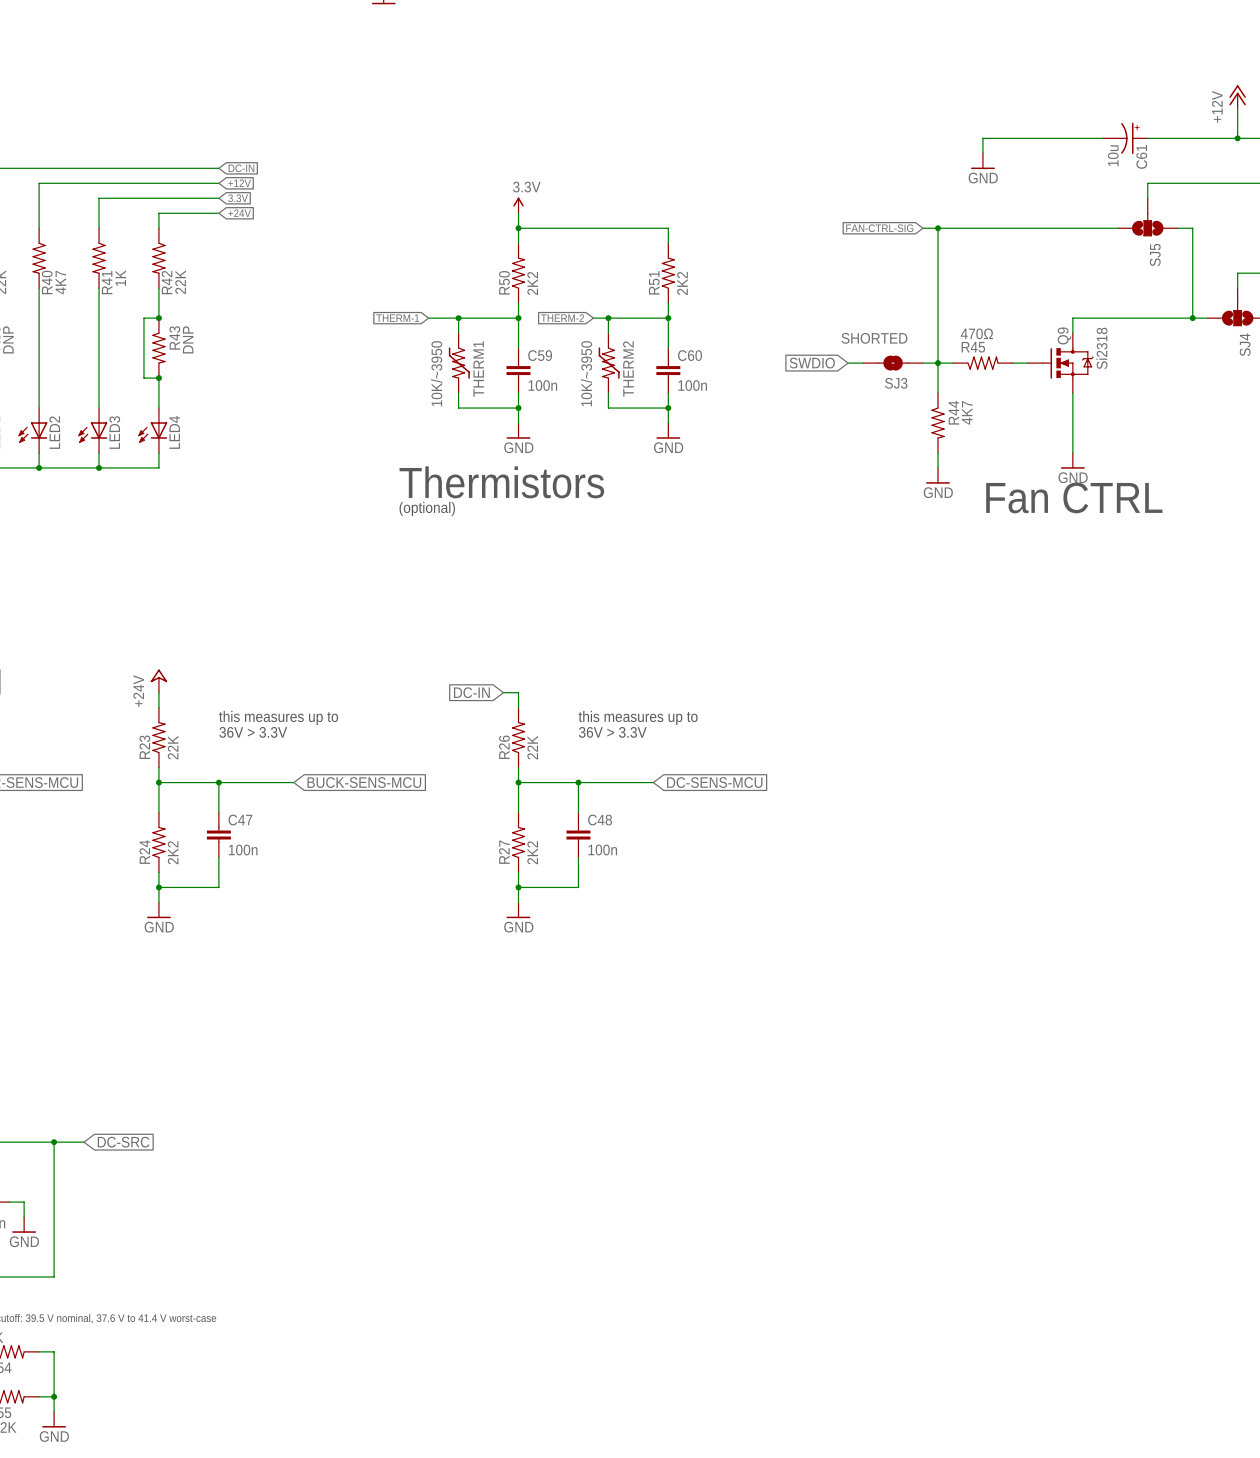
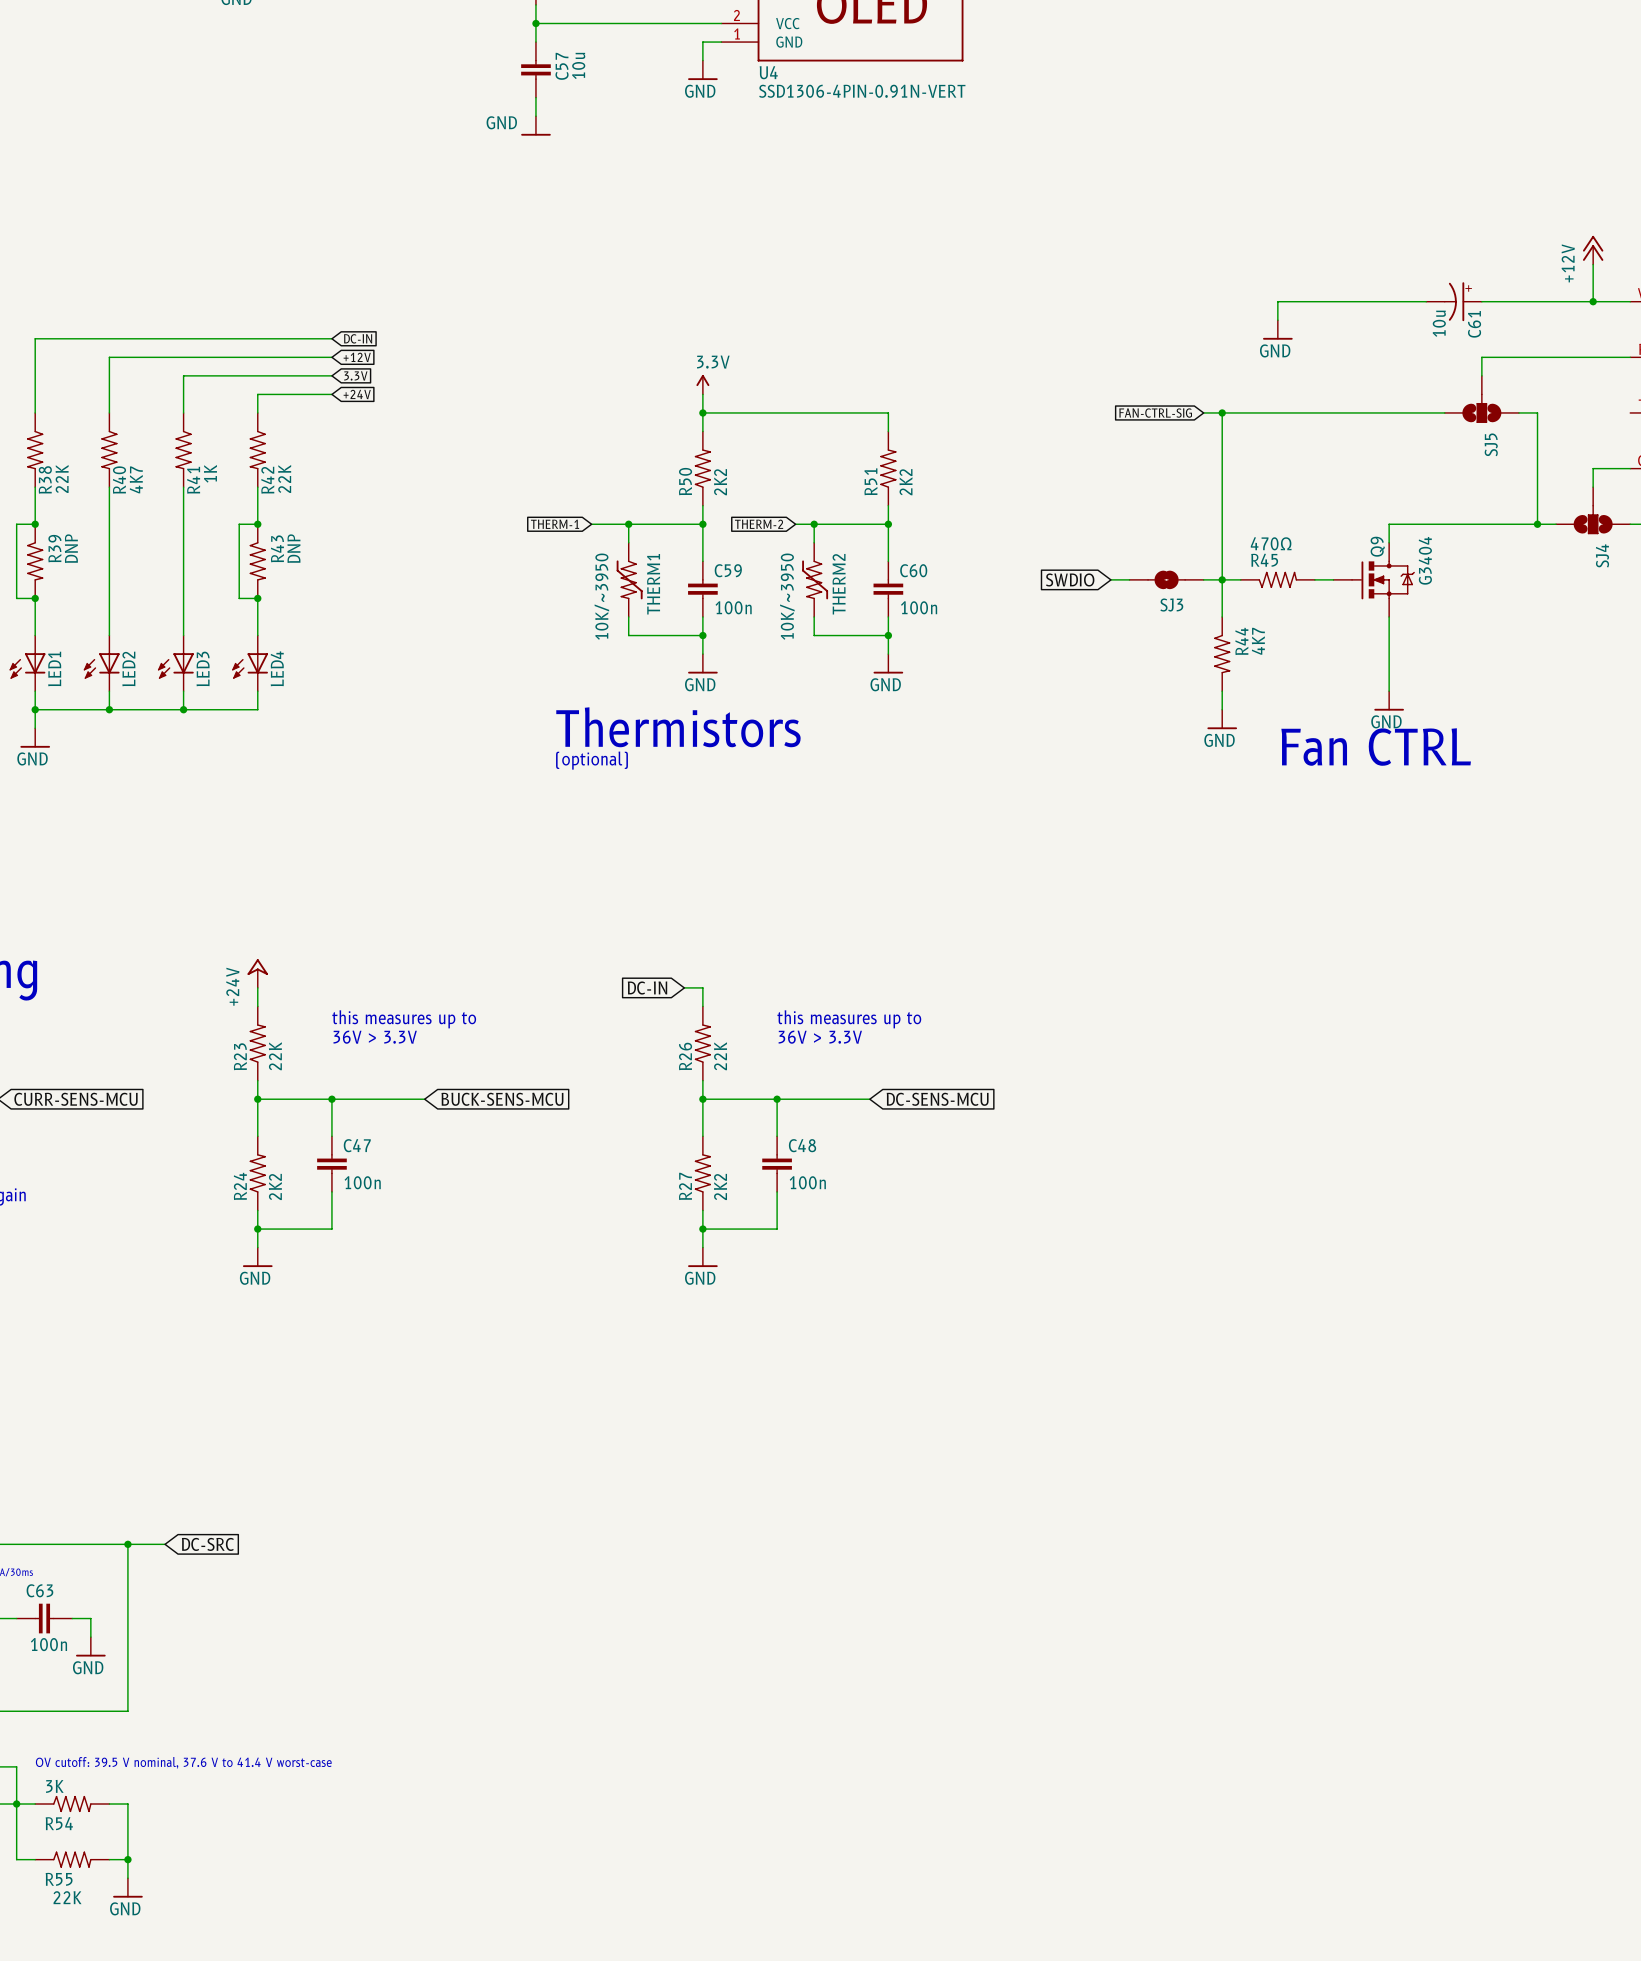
SJ3 value: SHORTED (874, 338) -> none
Q9 value: Si2318 (1101, 348) -> G3404 (1425, 560)

